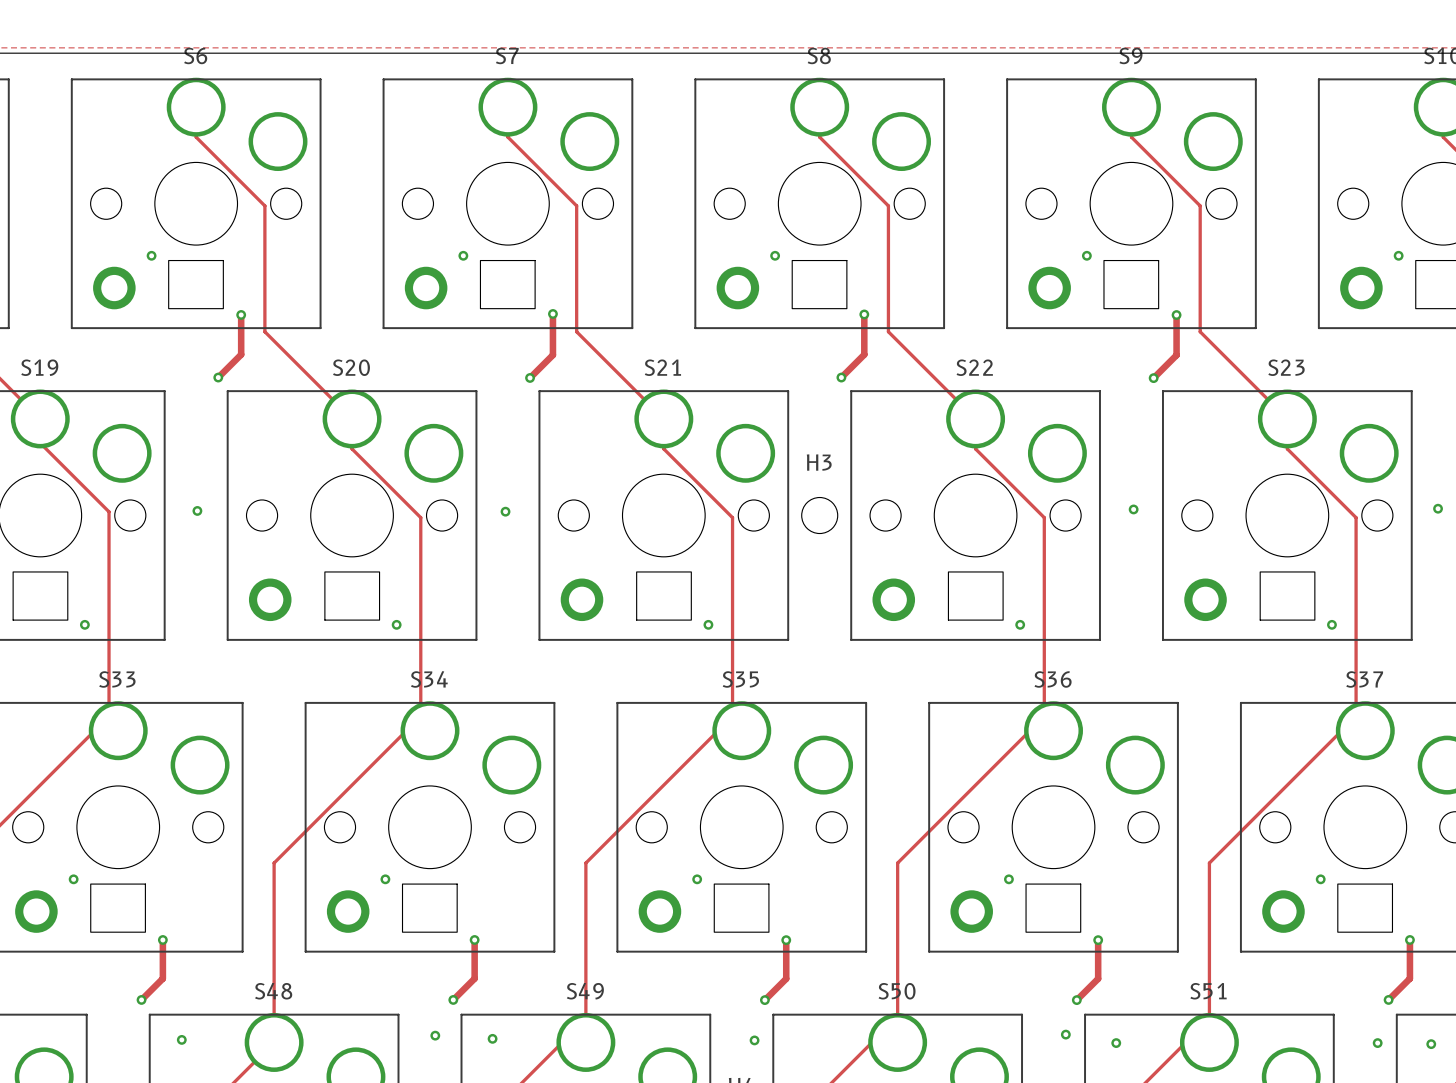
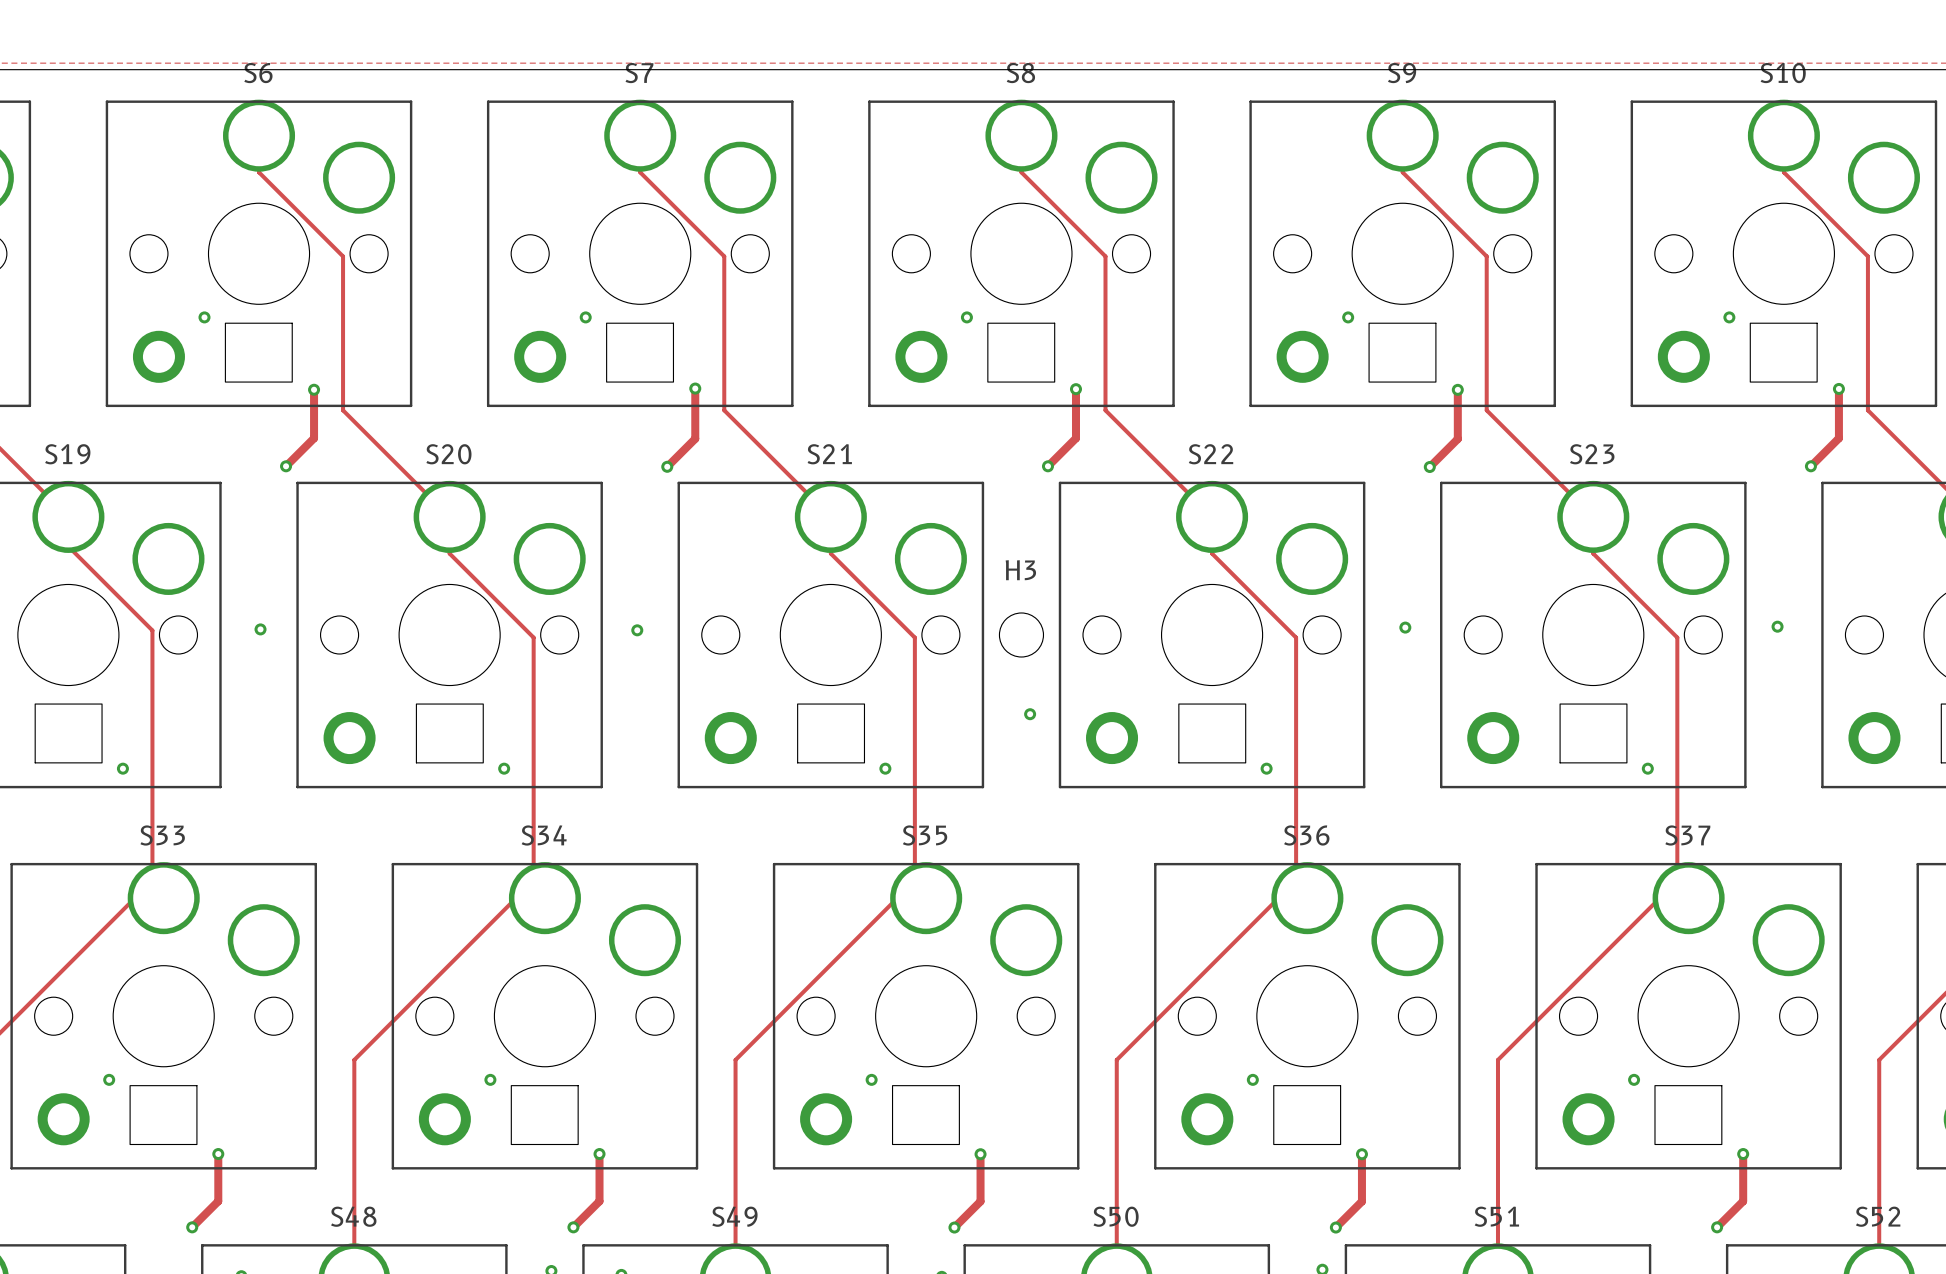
via: none -> (1030, 714)

